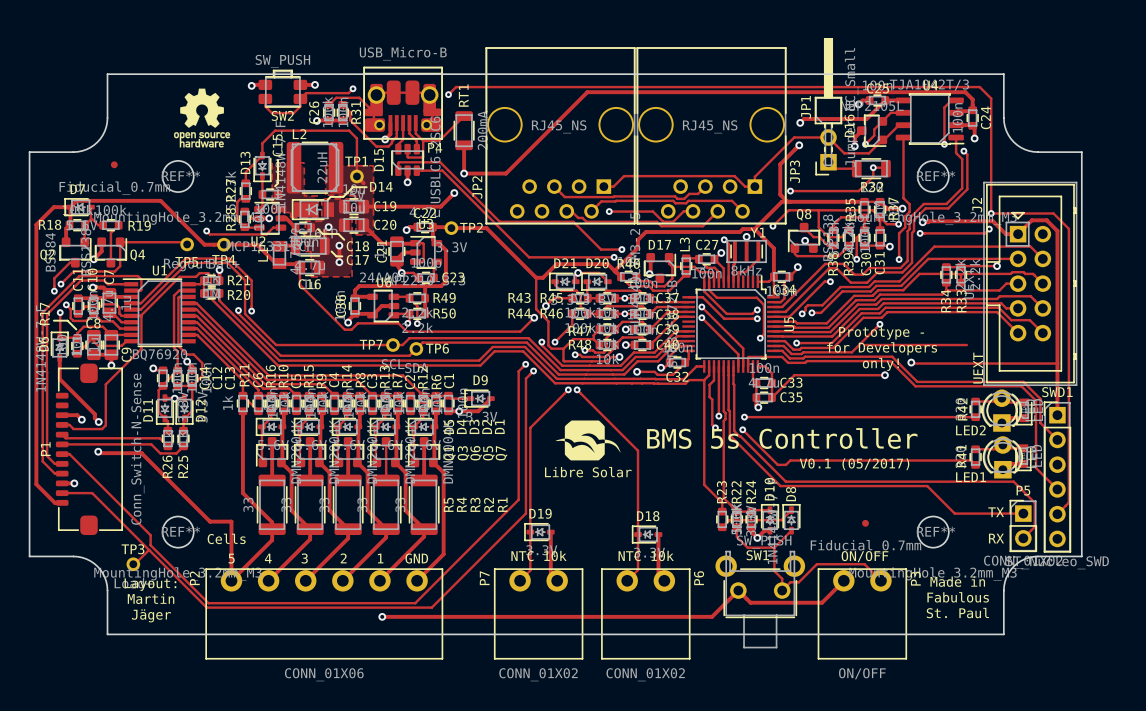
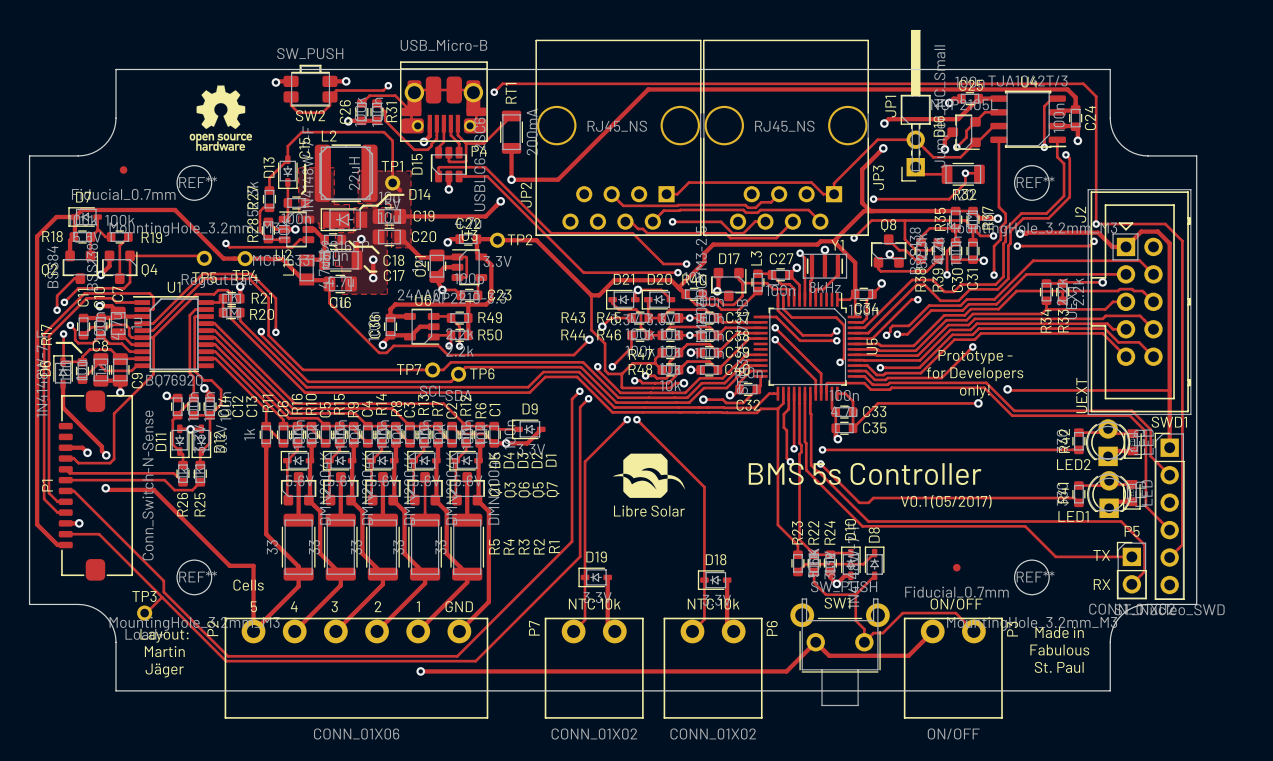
track: (865, 345) (966, 345) -> none

